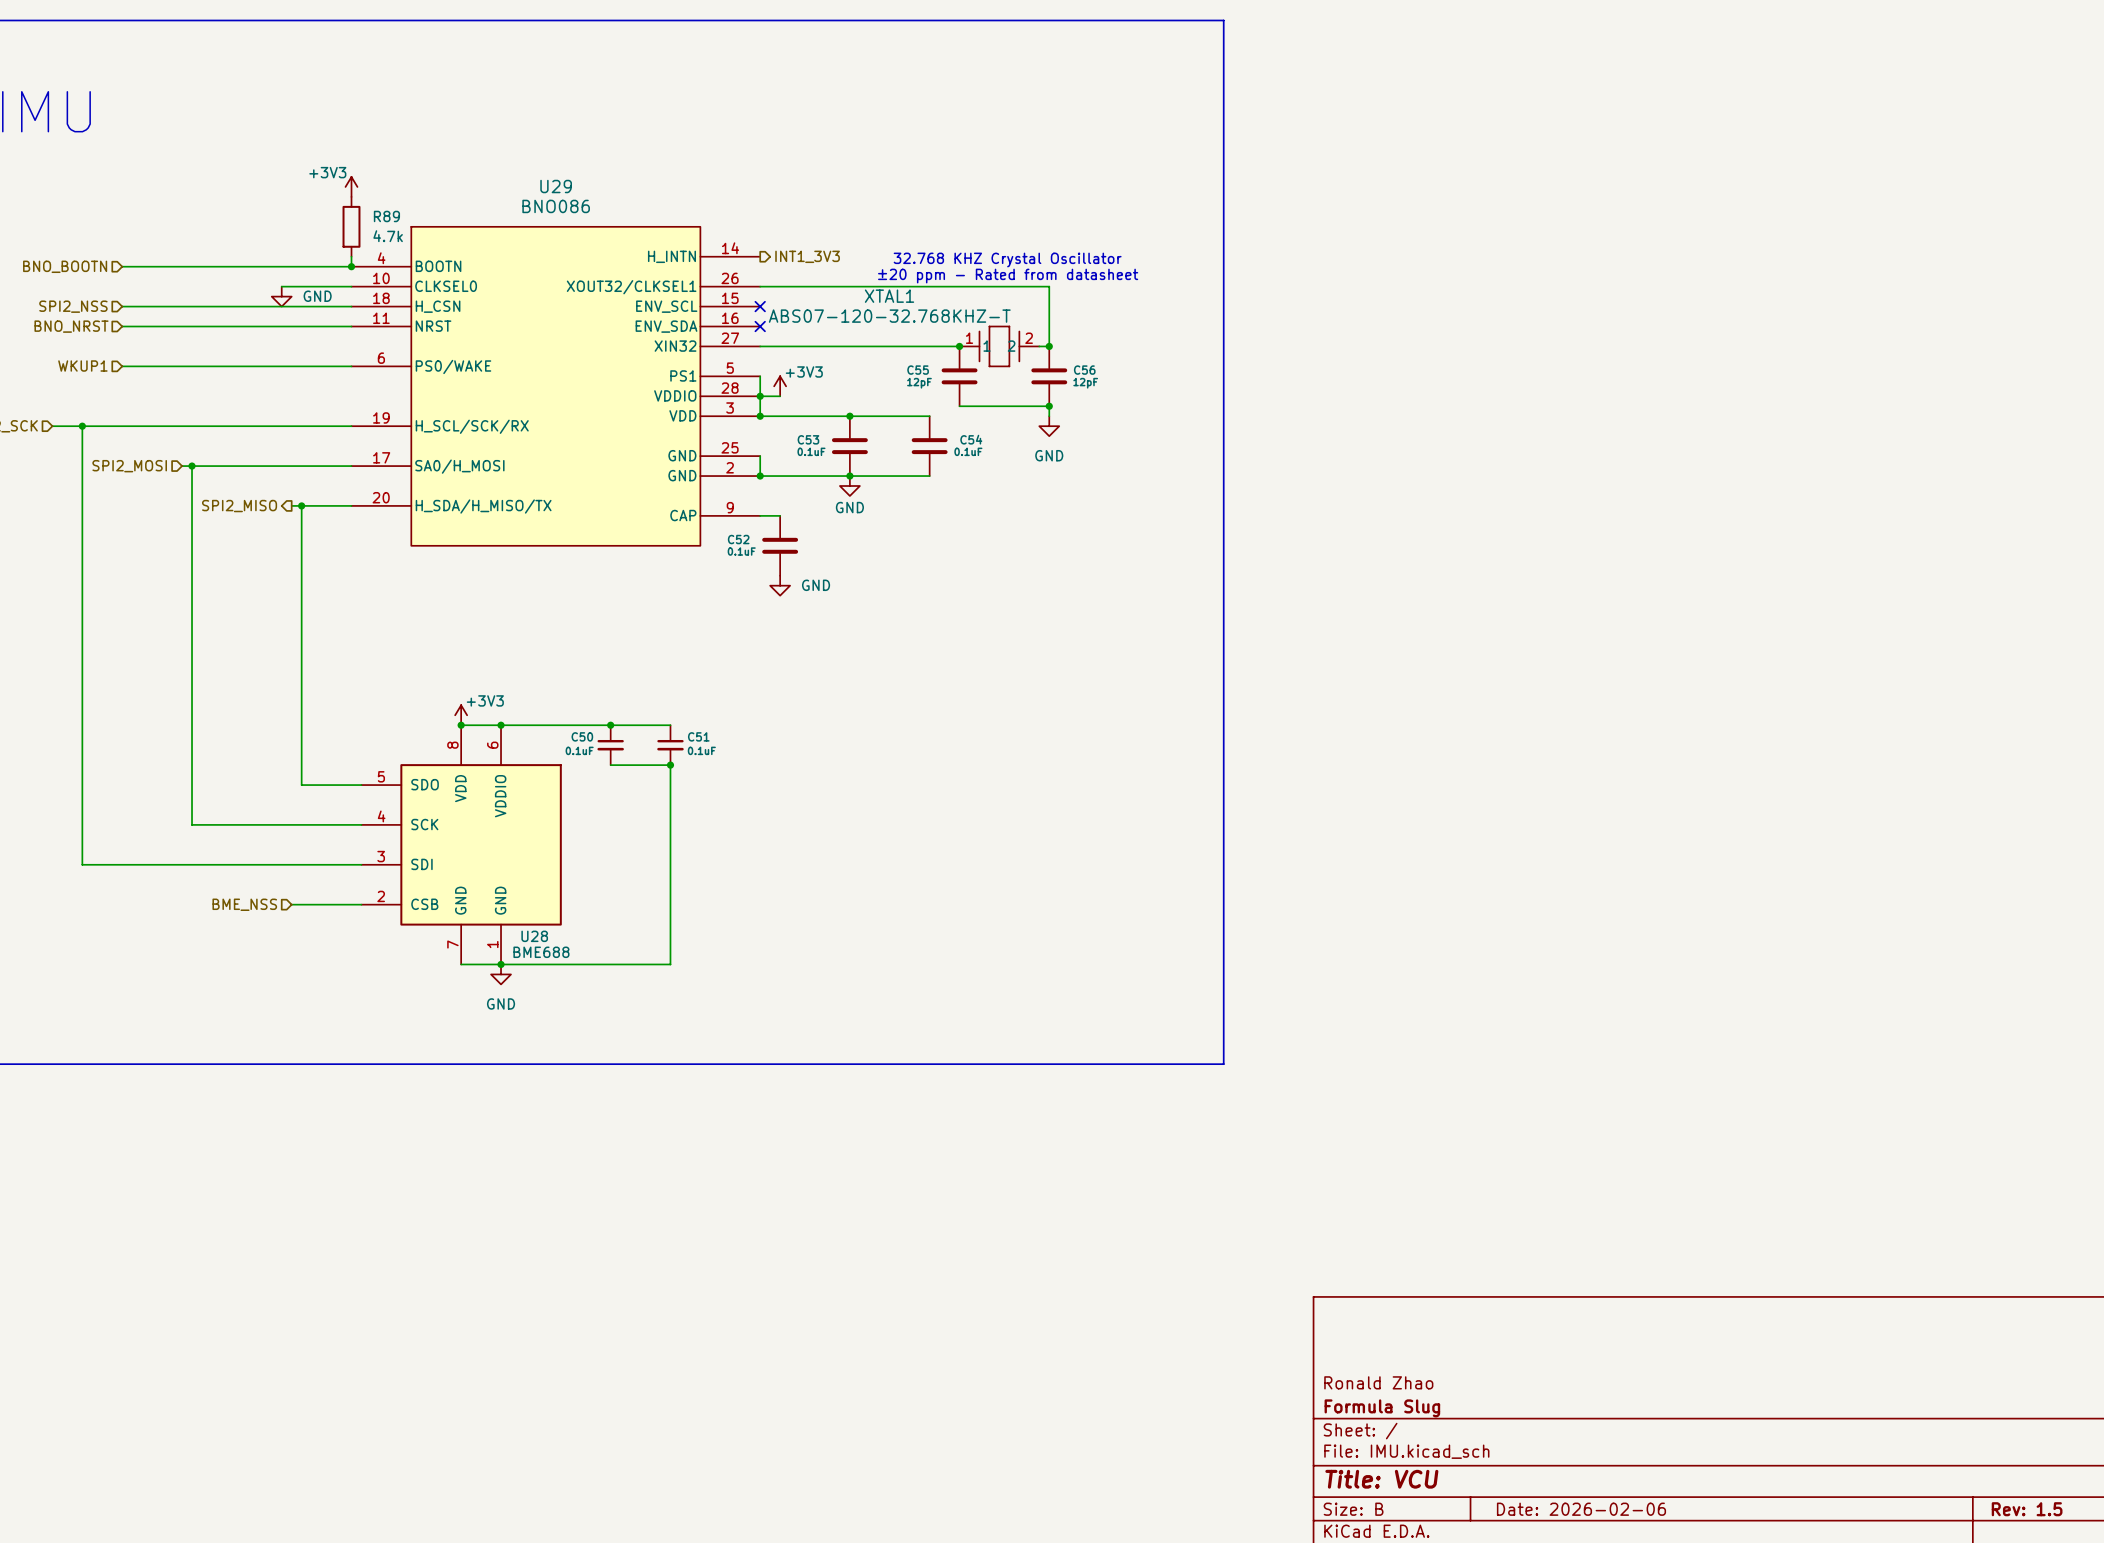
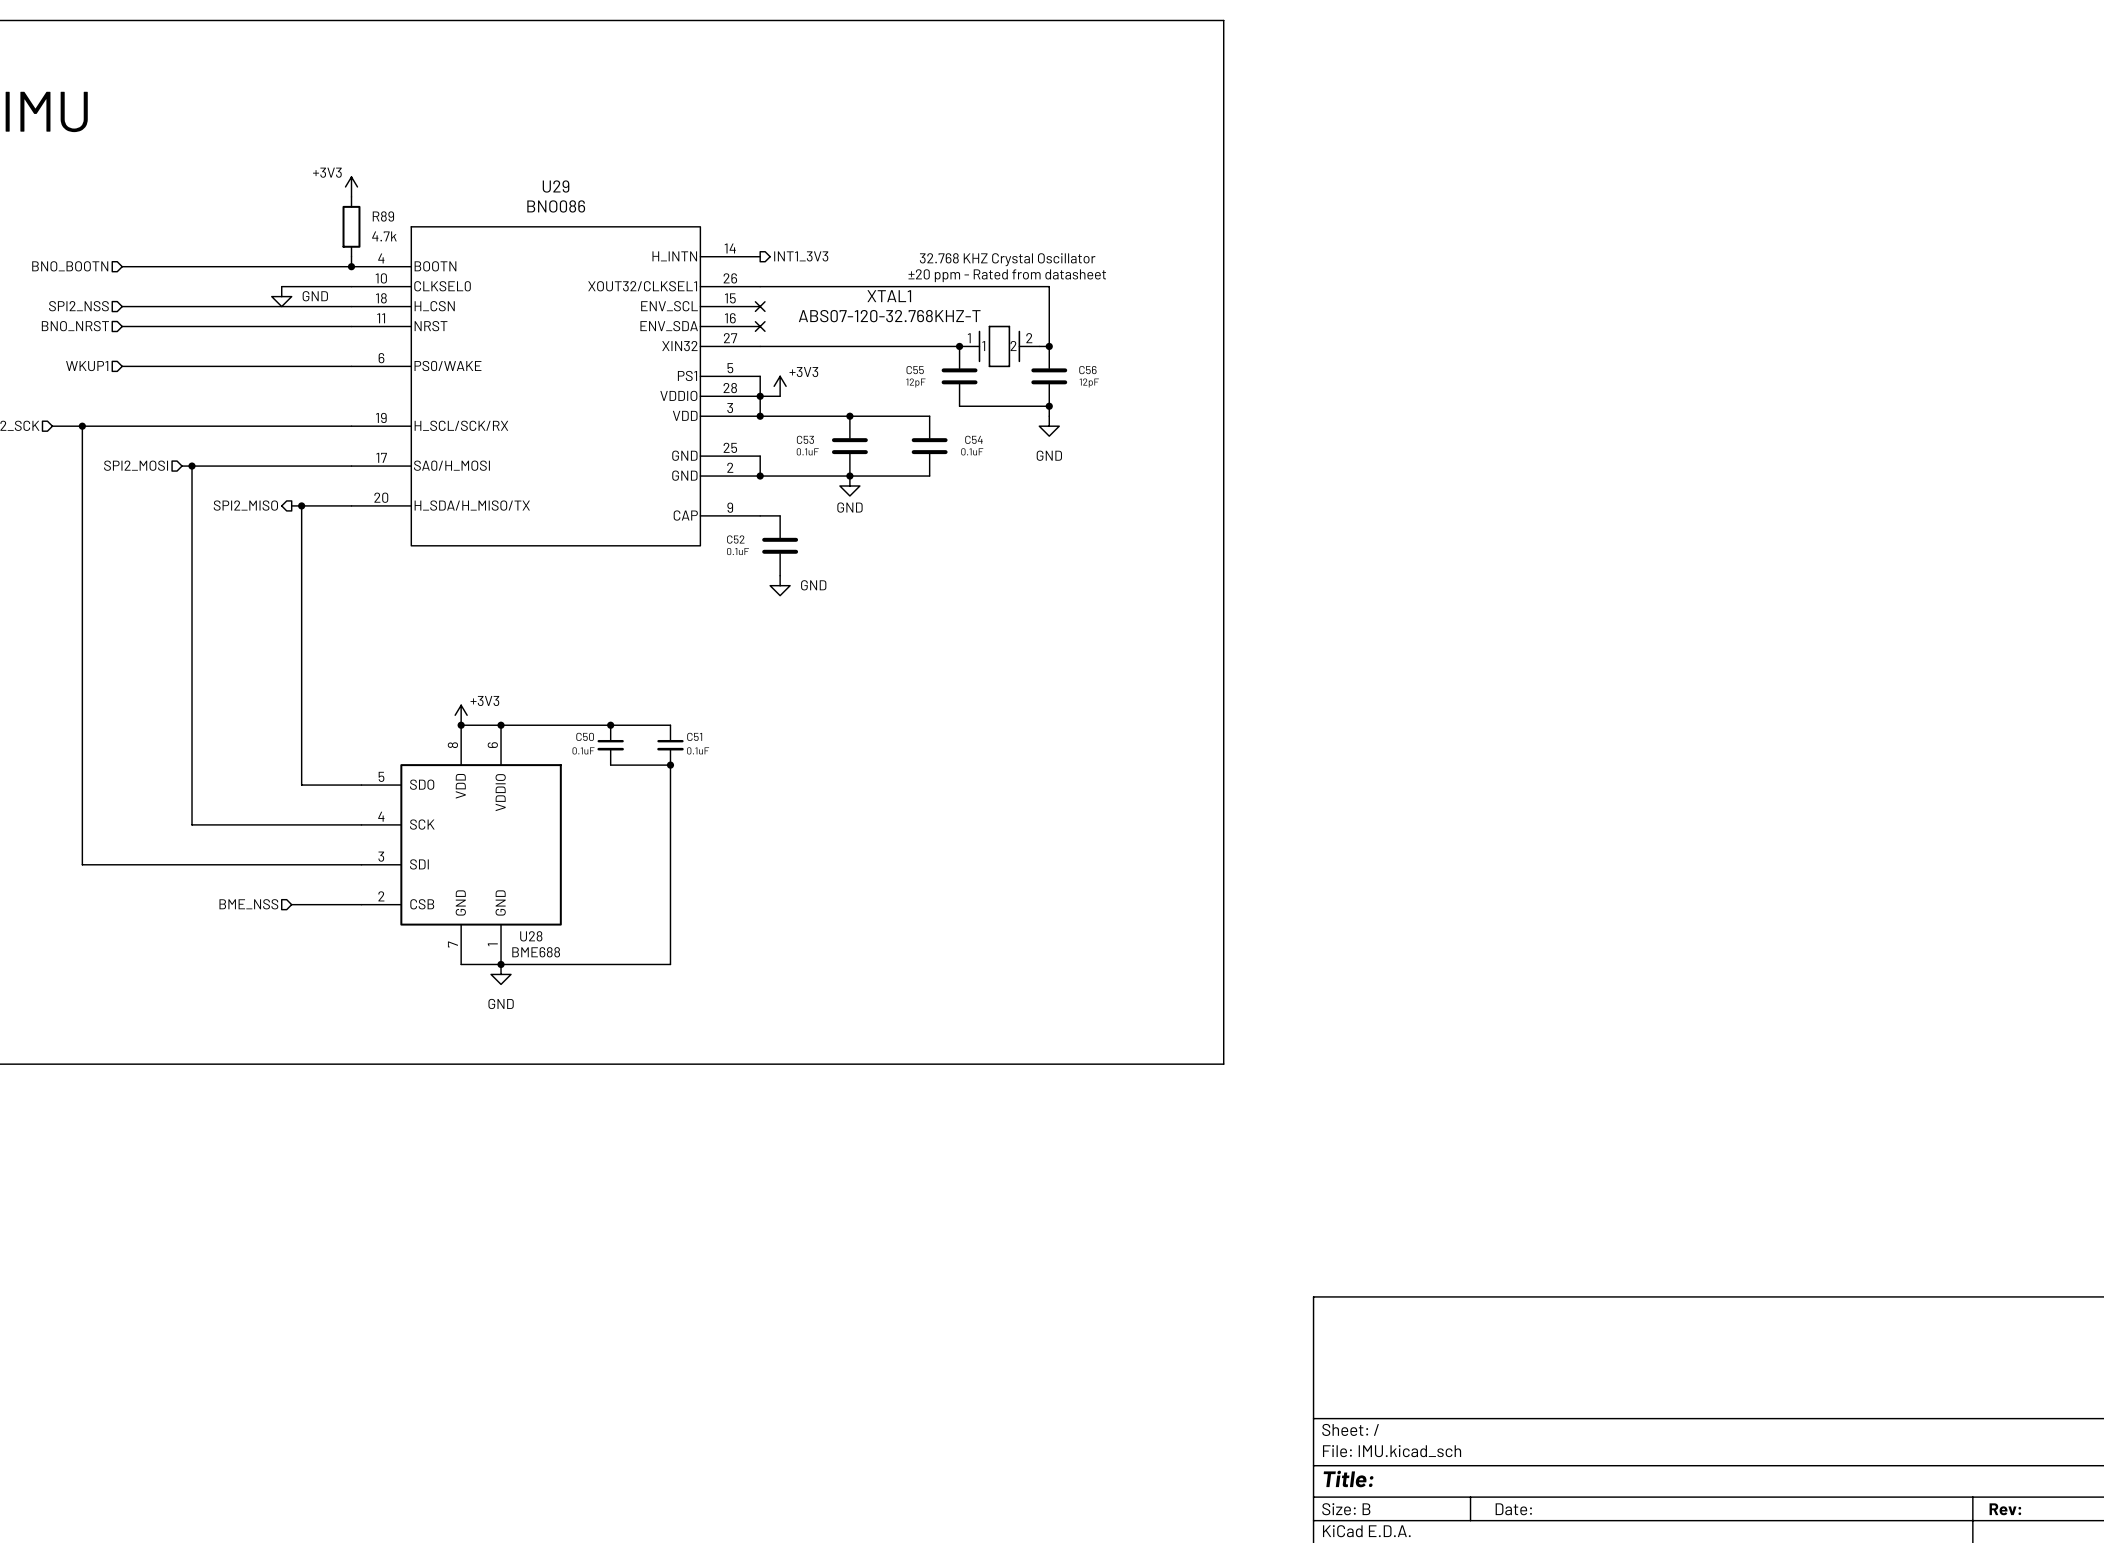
title block: Ronald Zhao (1378, 1382) -> none
title block: Formula Slug (1382, 1408) -> none
title block: Title: VCU (1381, 1479) -> Title: (1348, 1479)
title block: Date: 2026-02-06 (1581, 1509) -> Date: (1513, 1509)
title block: Rev: 1.5 (2027, 1509) -> Rev: (2005, 1509)

